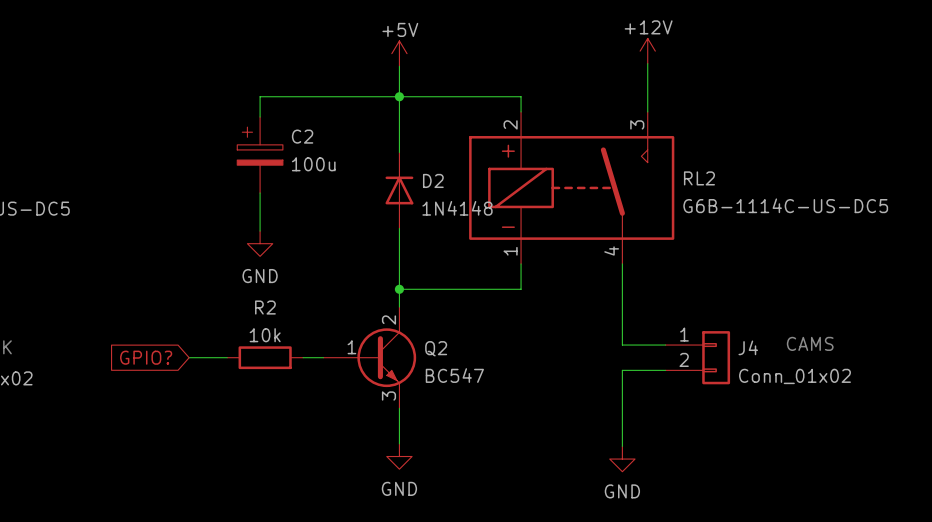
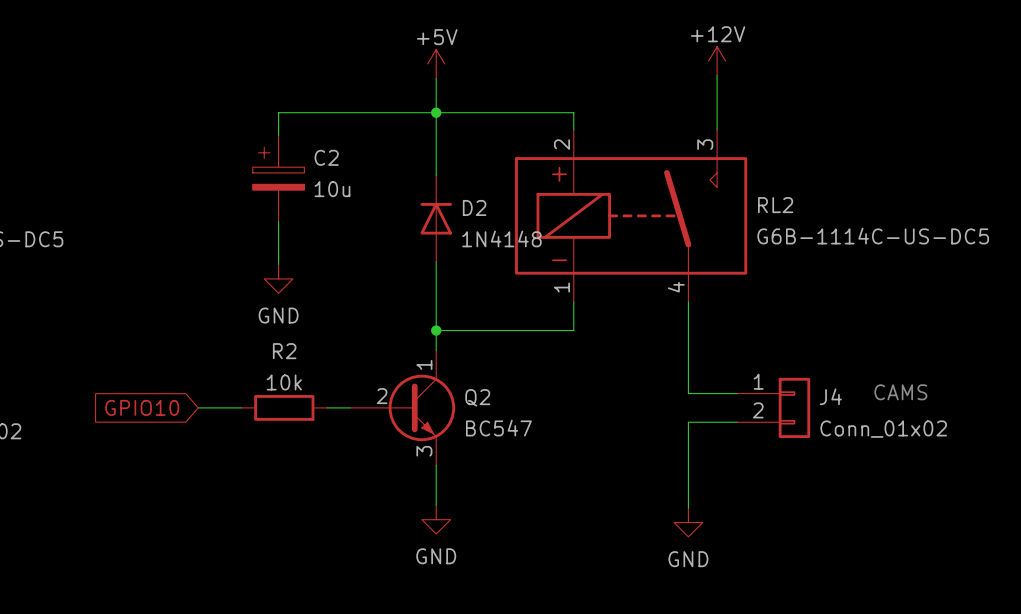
C2 value: 100u (313, 164) -> 10u (332, 189)
Q2 pin number: 2 (388, 320) -> 1 (424, 364)
Q2 pin number: 1 (351, 347) -> 2 (382, 396)
global label: GPIO? (146, 357) -> GPIO10 (142, 407)

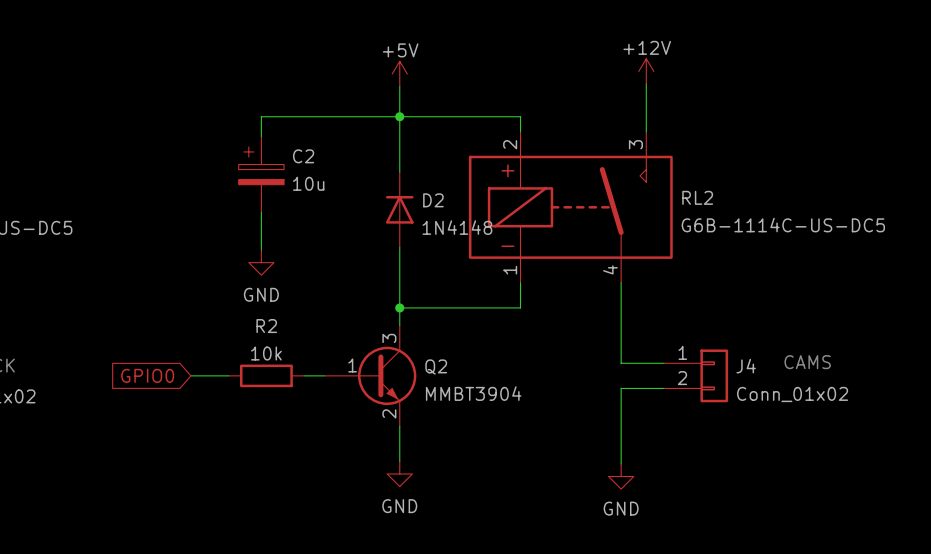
Q2 pin number: 1 (424, 364) -> 3 (389, 338)
Q2 pin number: 2 (382, 396) -> 1 (352, 365)
global label: GPIO10 (142, 407) -> GPIO0 (147, 375)
Q2 value: BC547 (498, 428) -> MMBT3904 (473, 393)
Q2 pin number: 3 (424, 451) -> 2 (389, 413)

